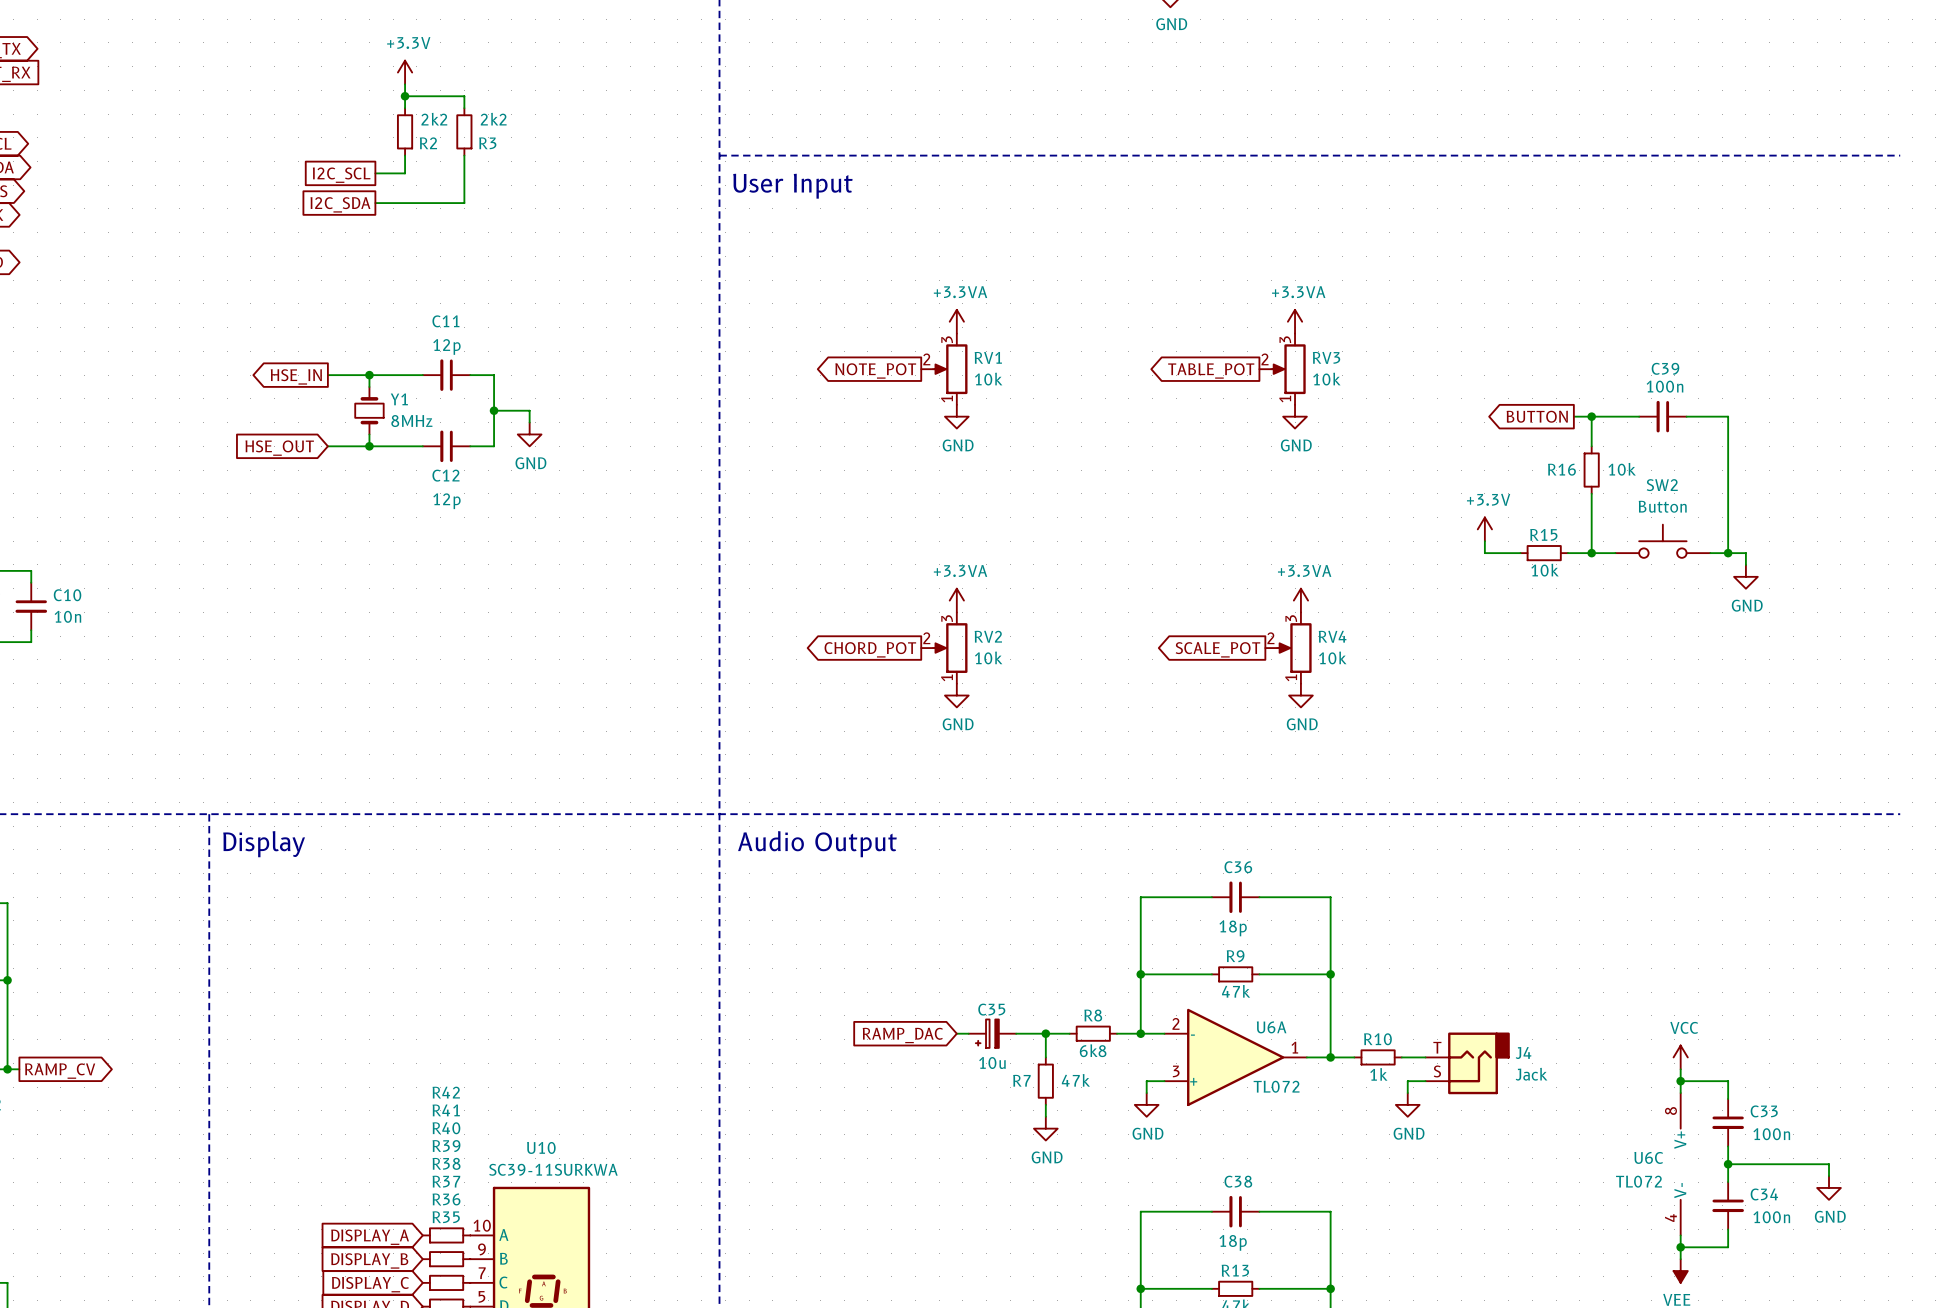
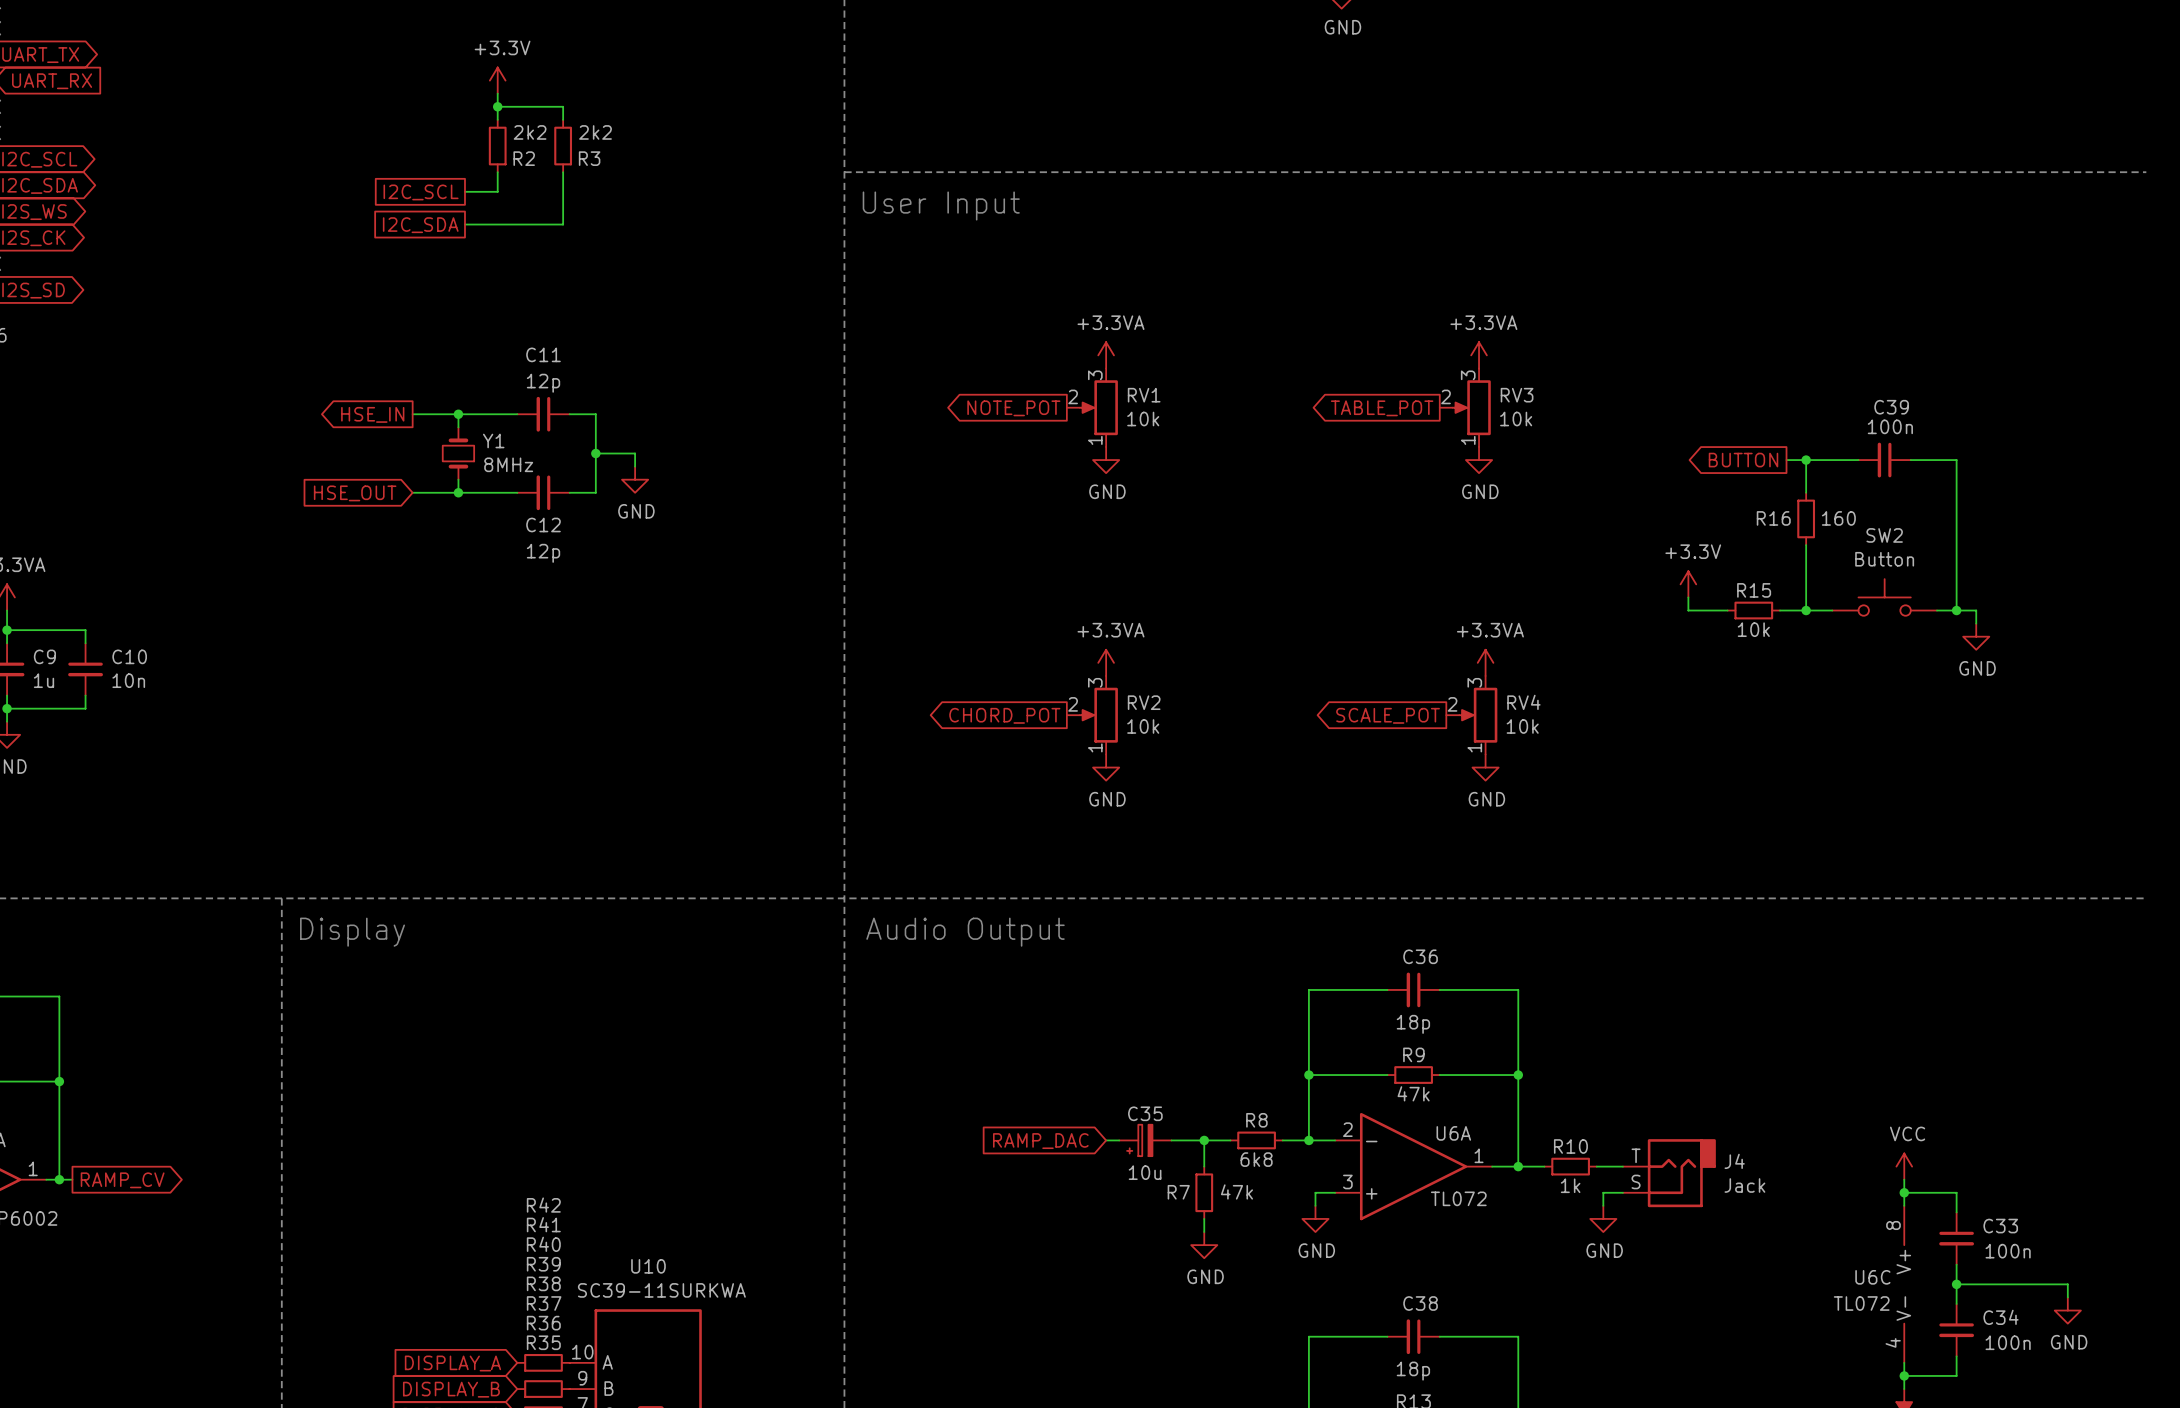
R16 value: 10k (1622, 469) -> 160 (1838, 518)

